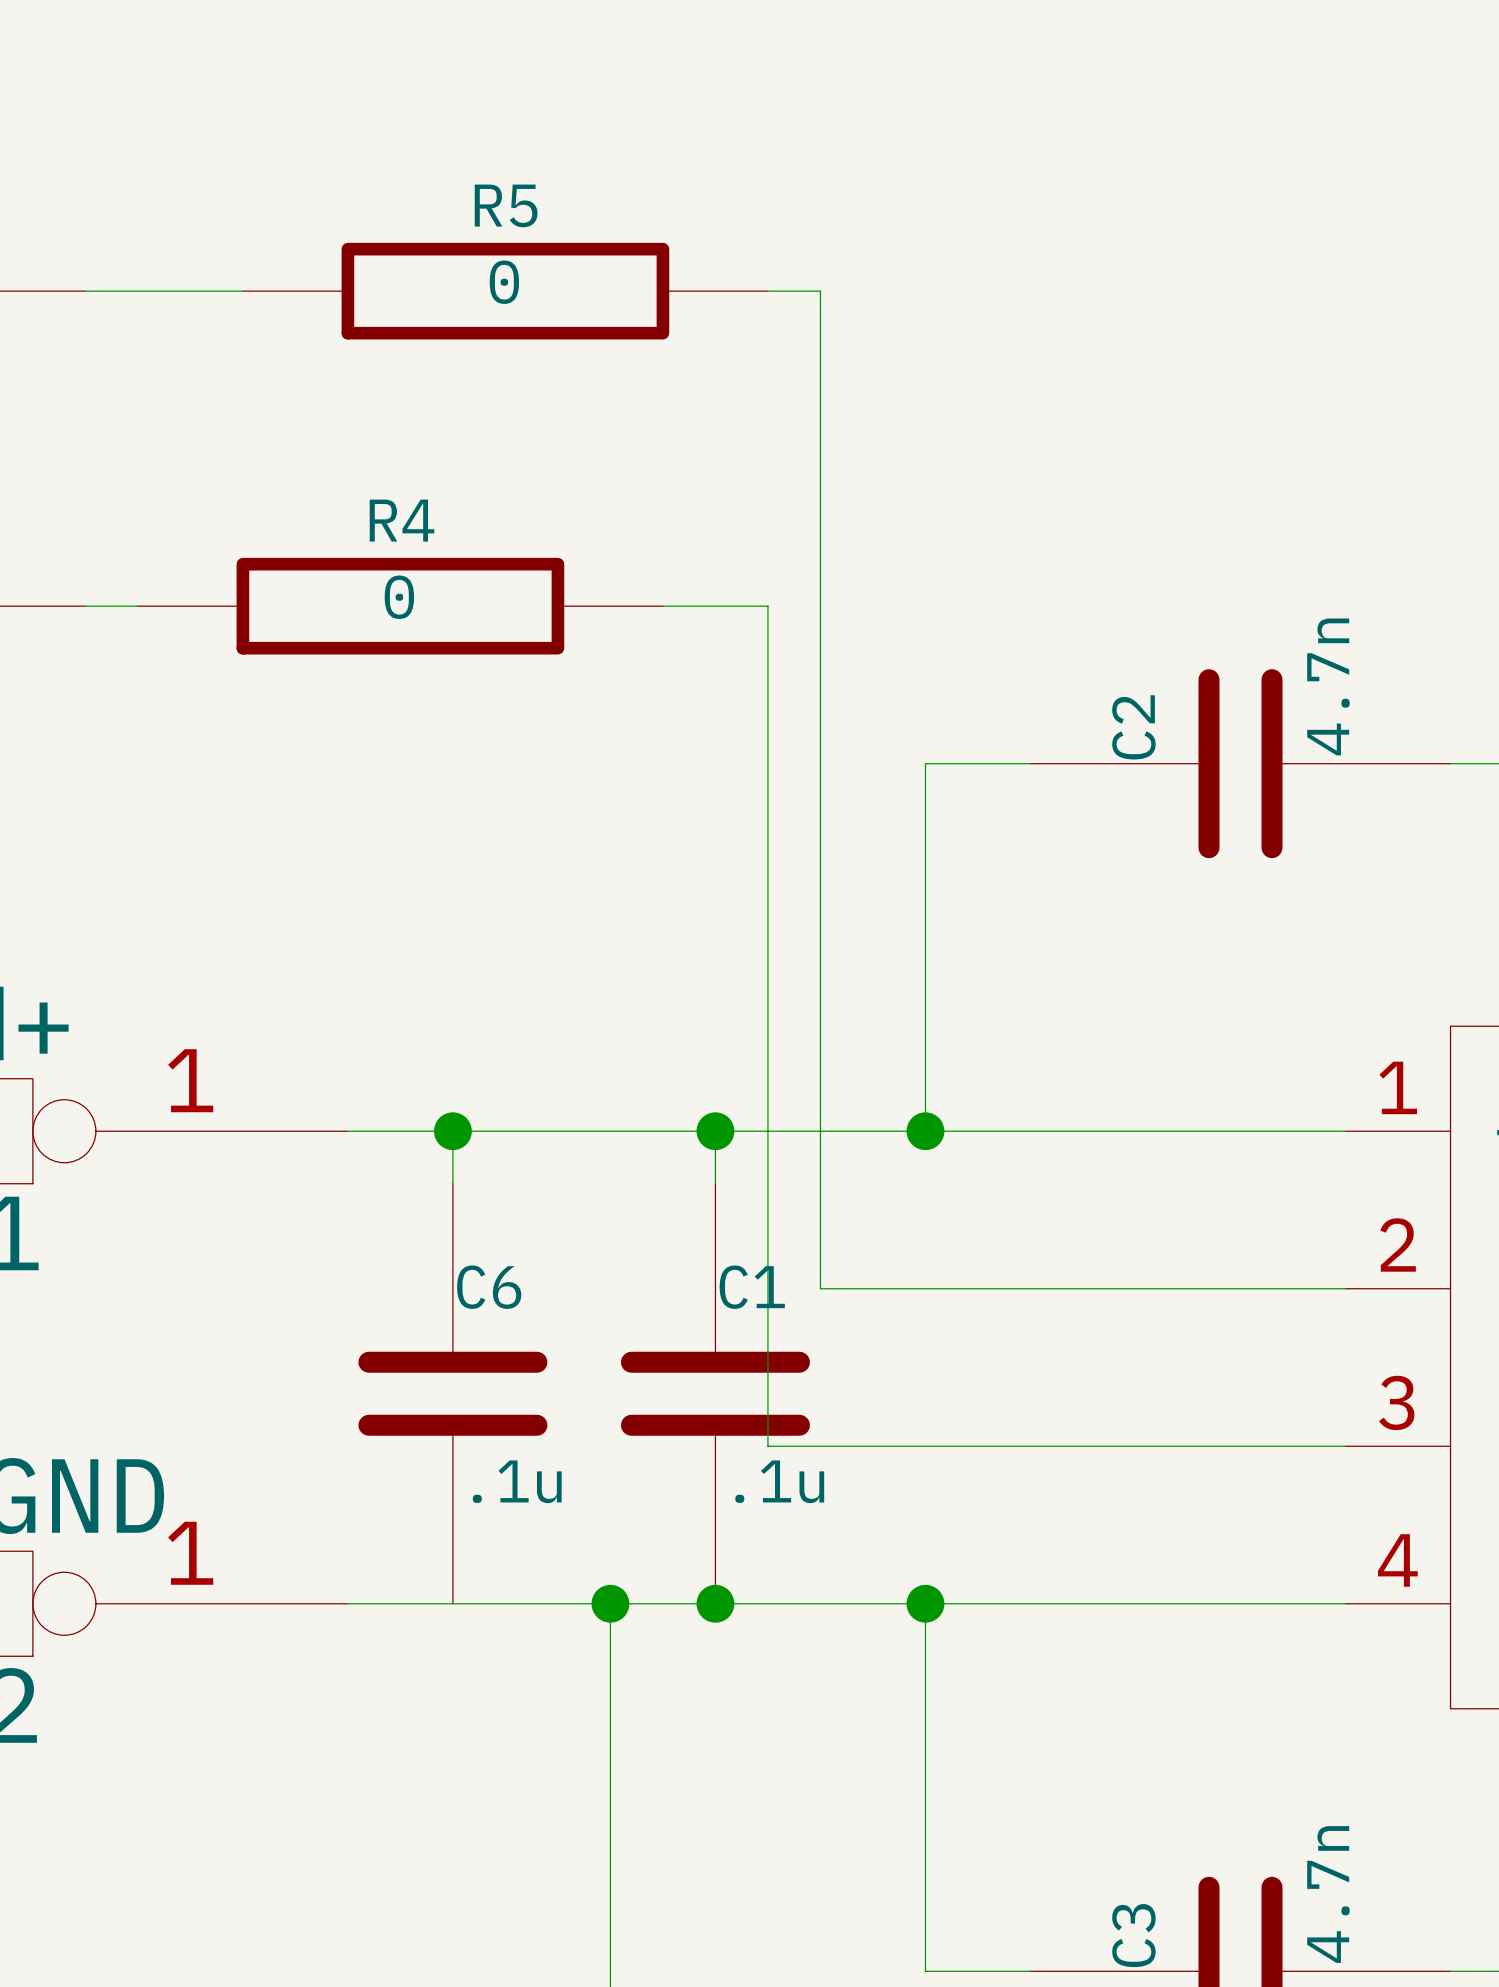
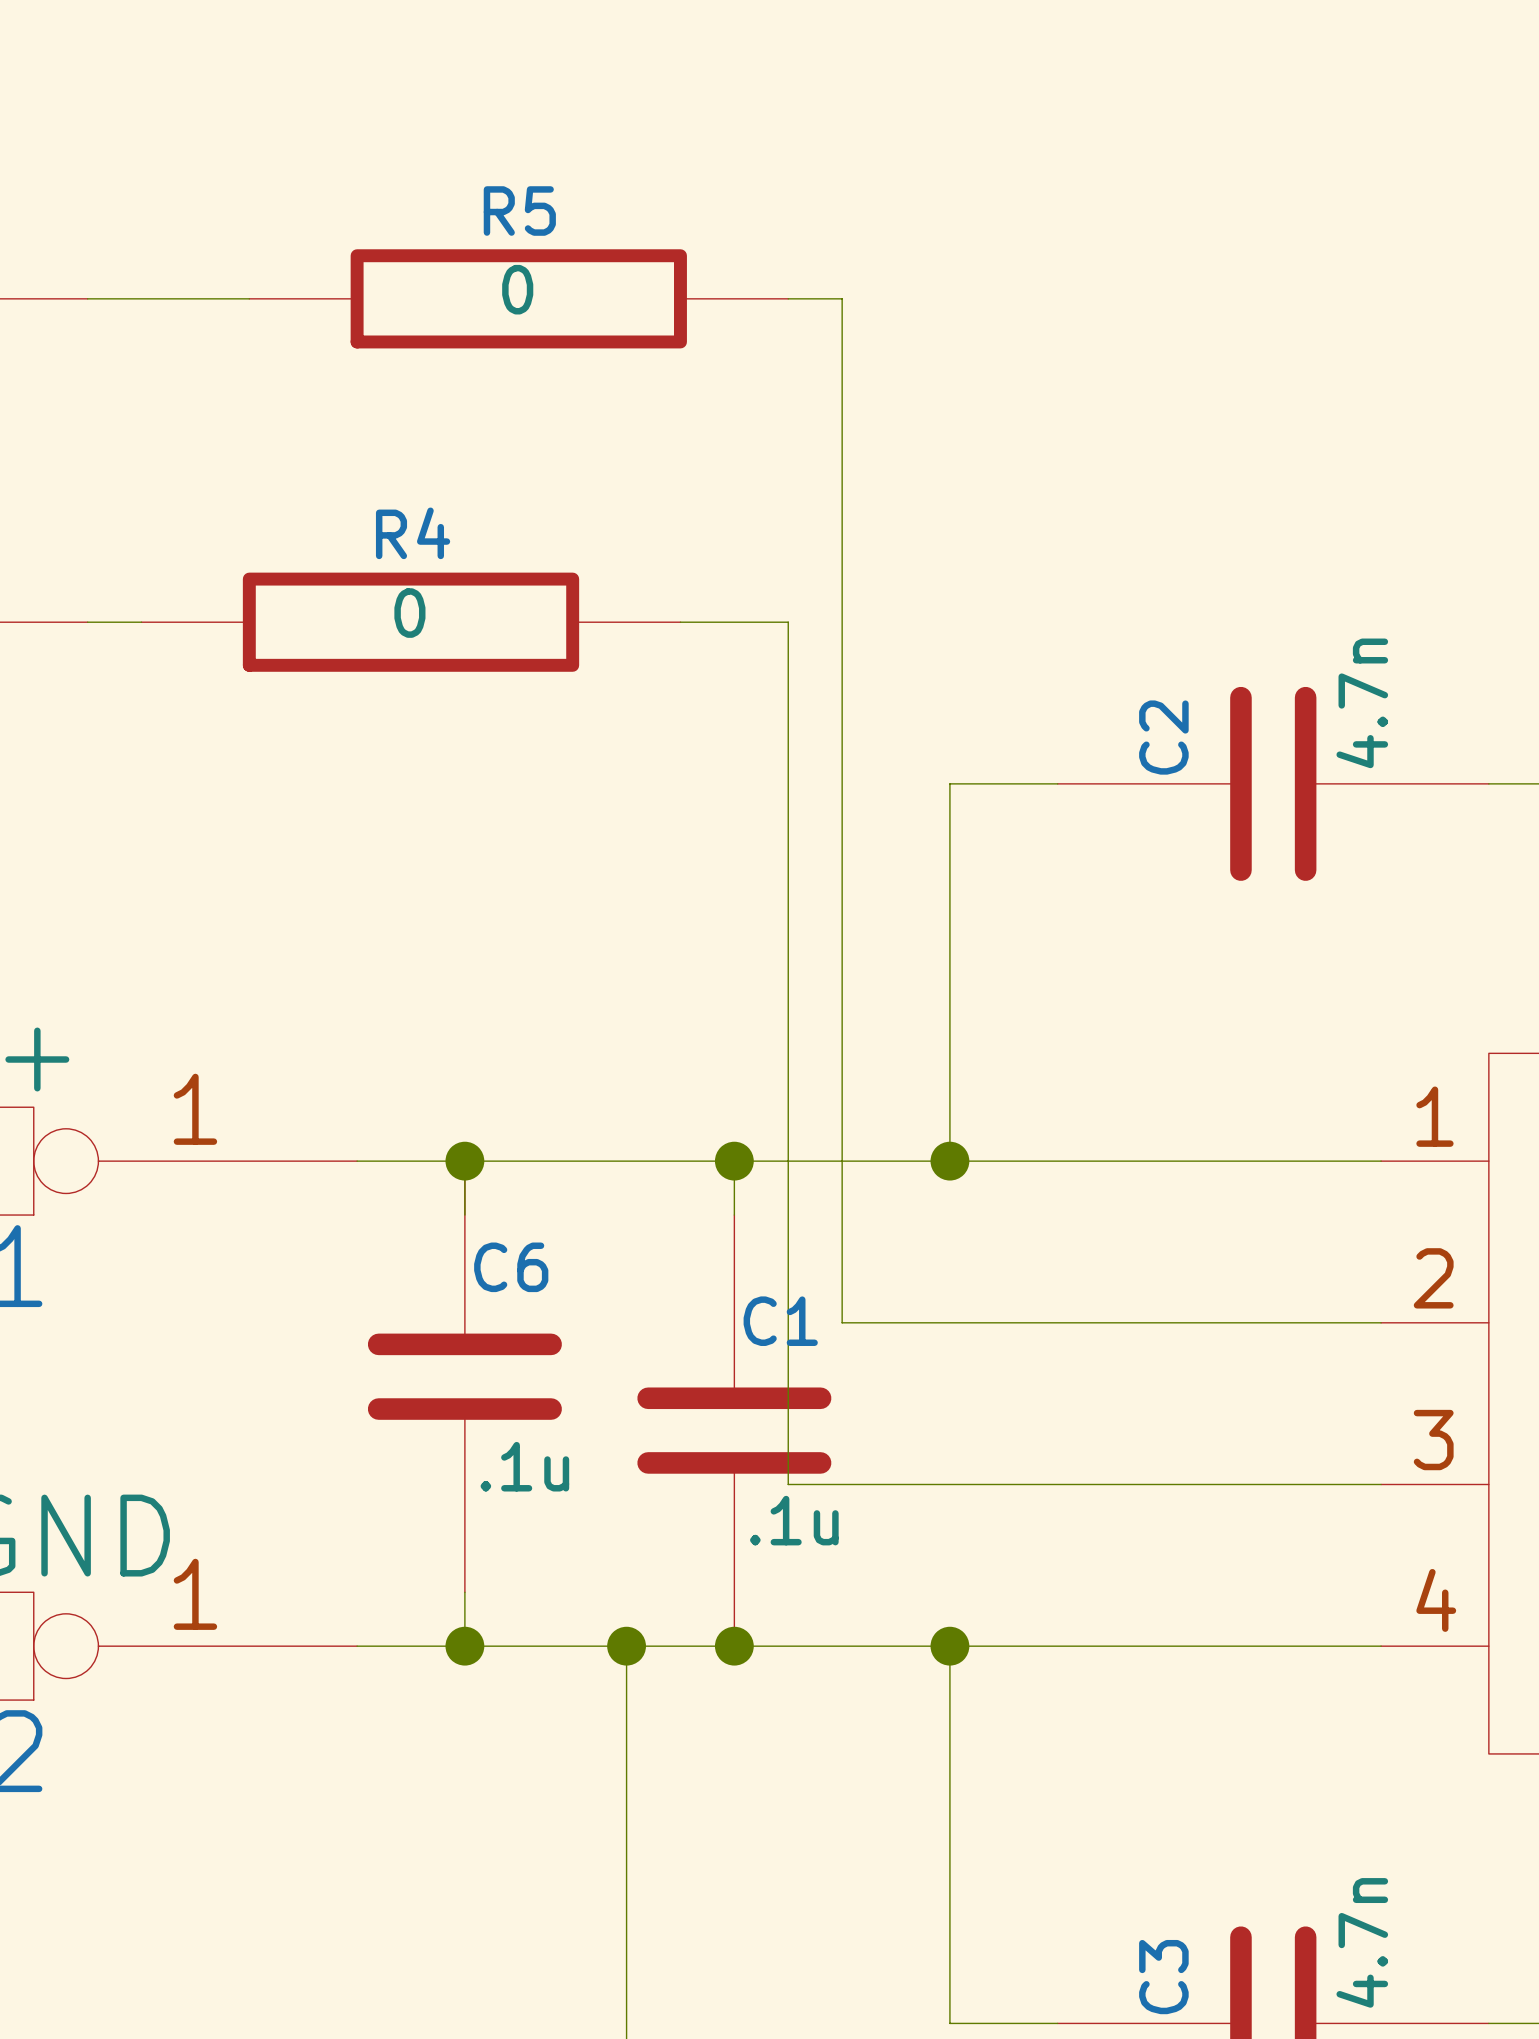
C6 position: (452, 1393) -> (464, 1376)
junction: none -> (464, 1646)

